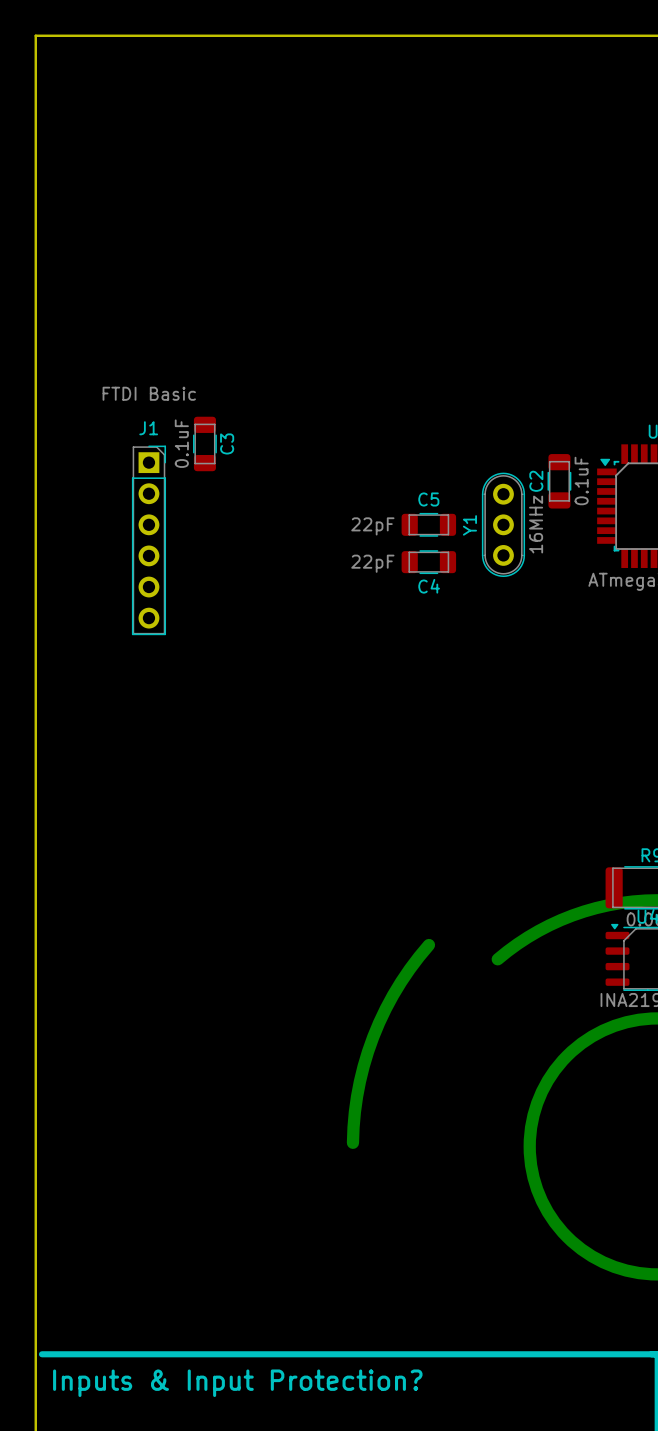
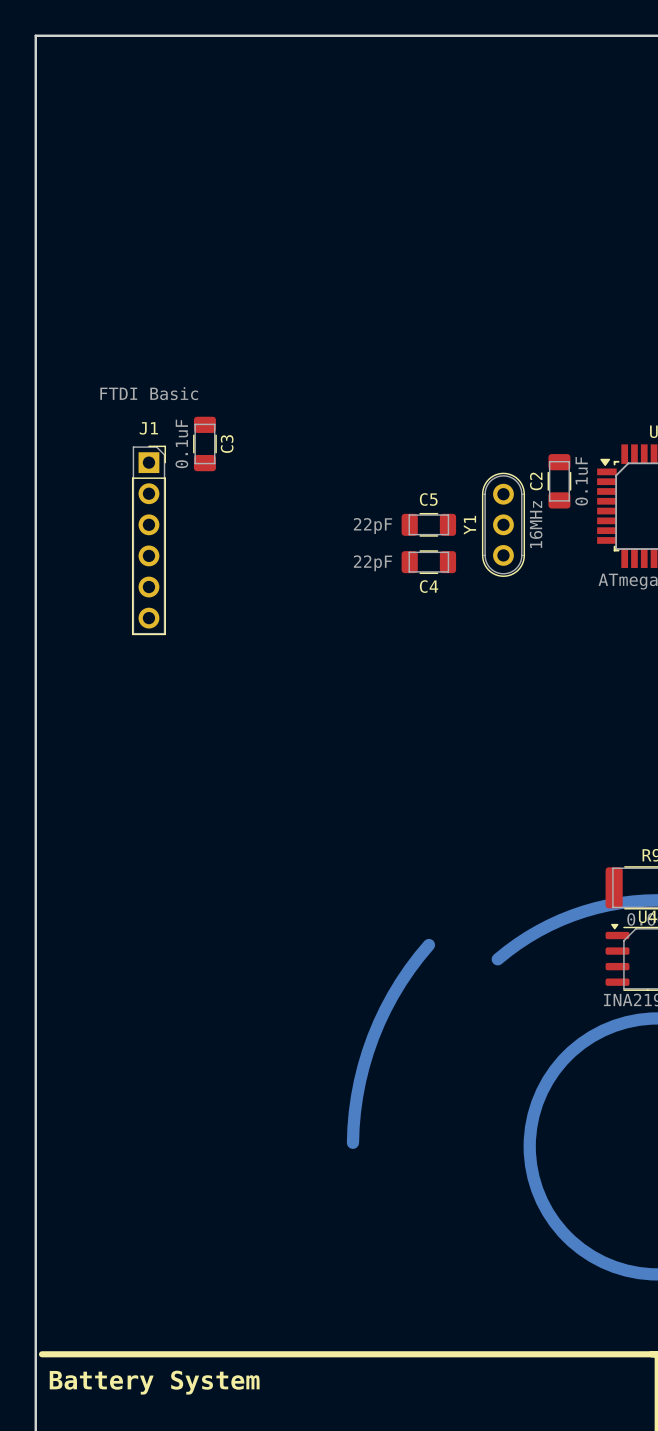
text: Inputs & Input Protection? (237, 1383) -> Battery System (154, 1382)

